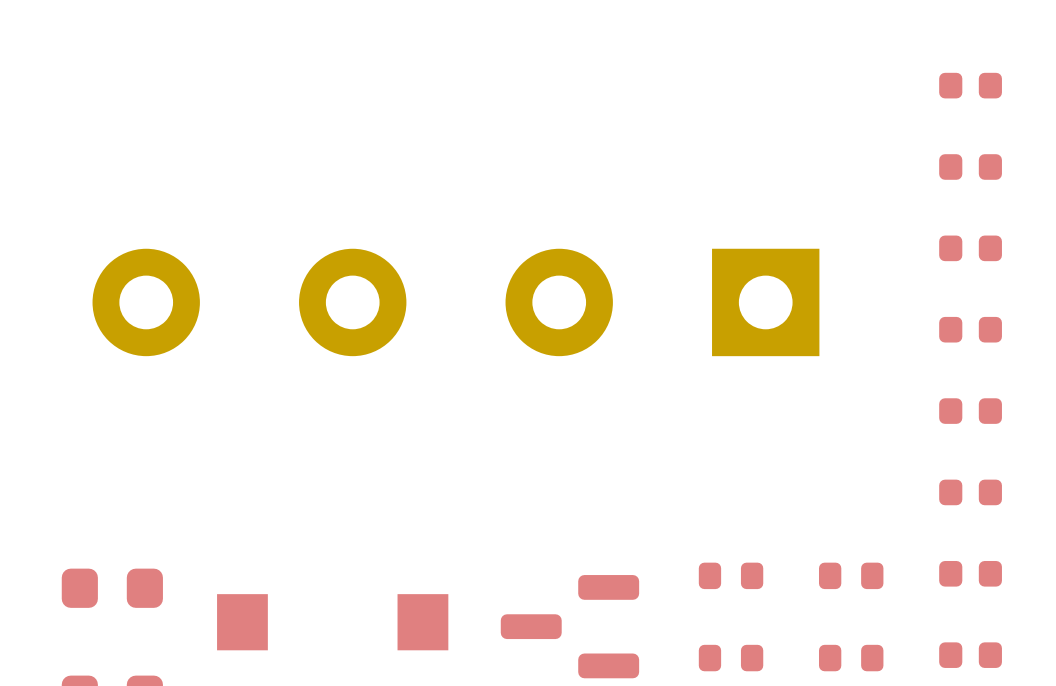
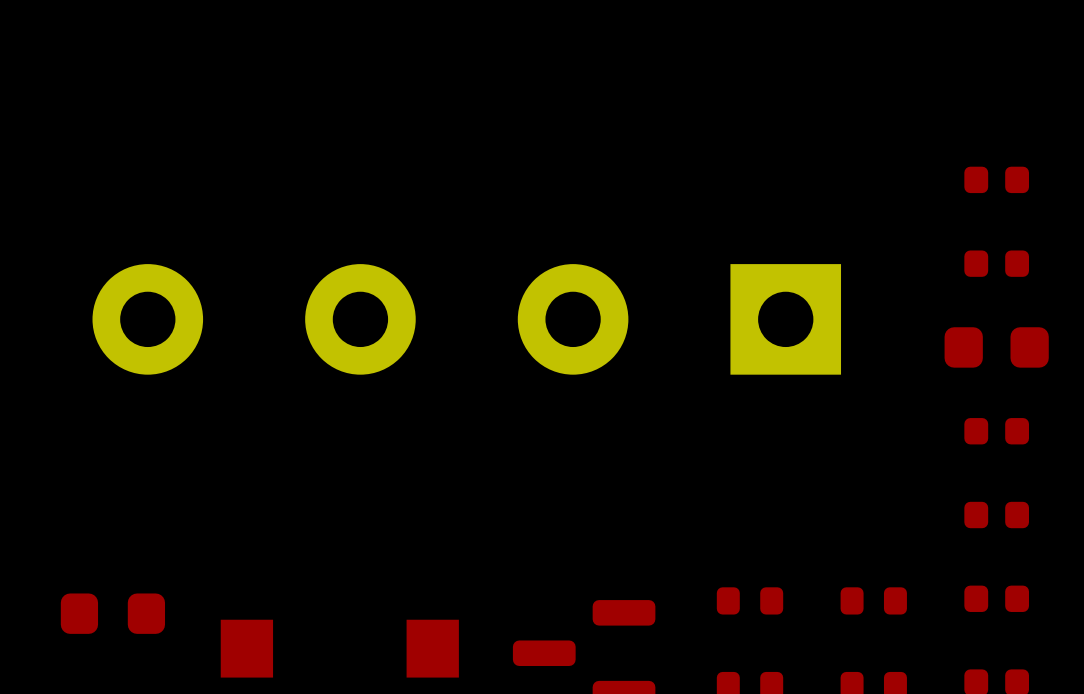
part: (970, 85) -> none
part footprint: [939, 316, 1002, 343] -> [944, 327, 1049, 368]

